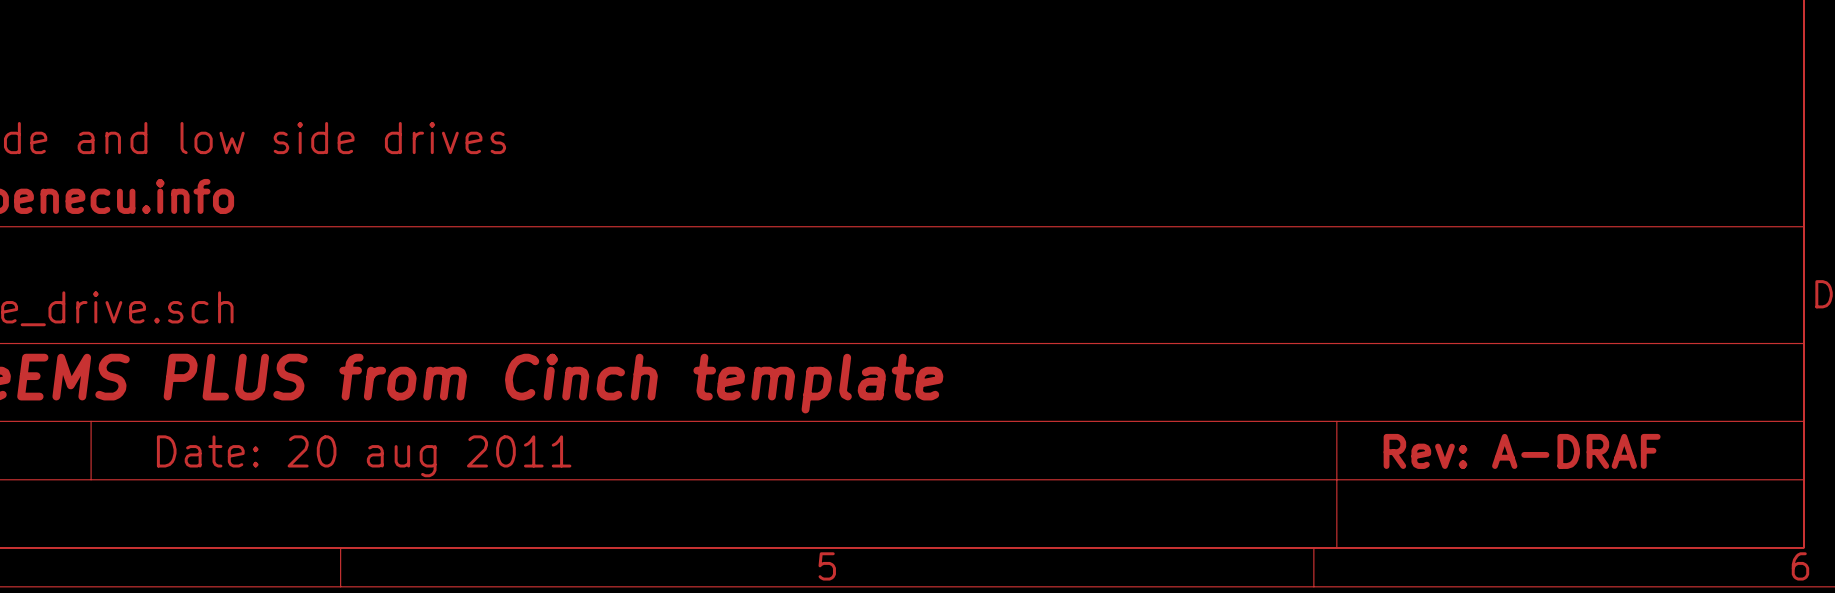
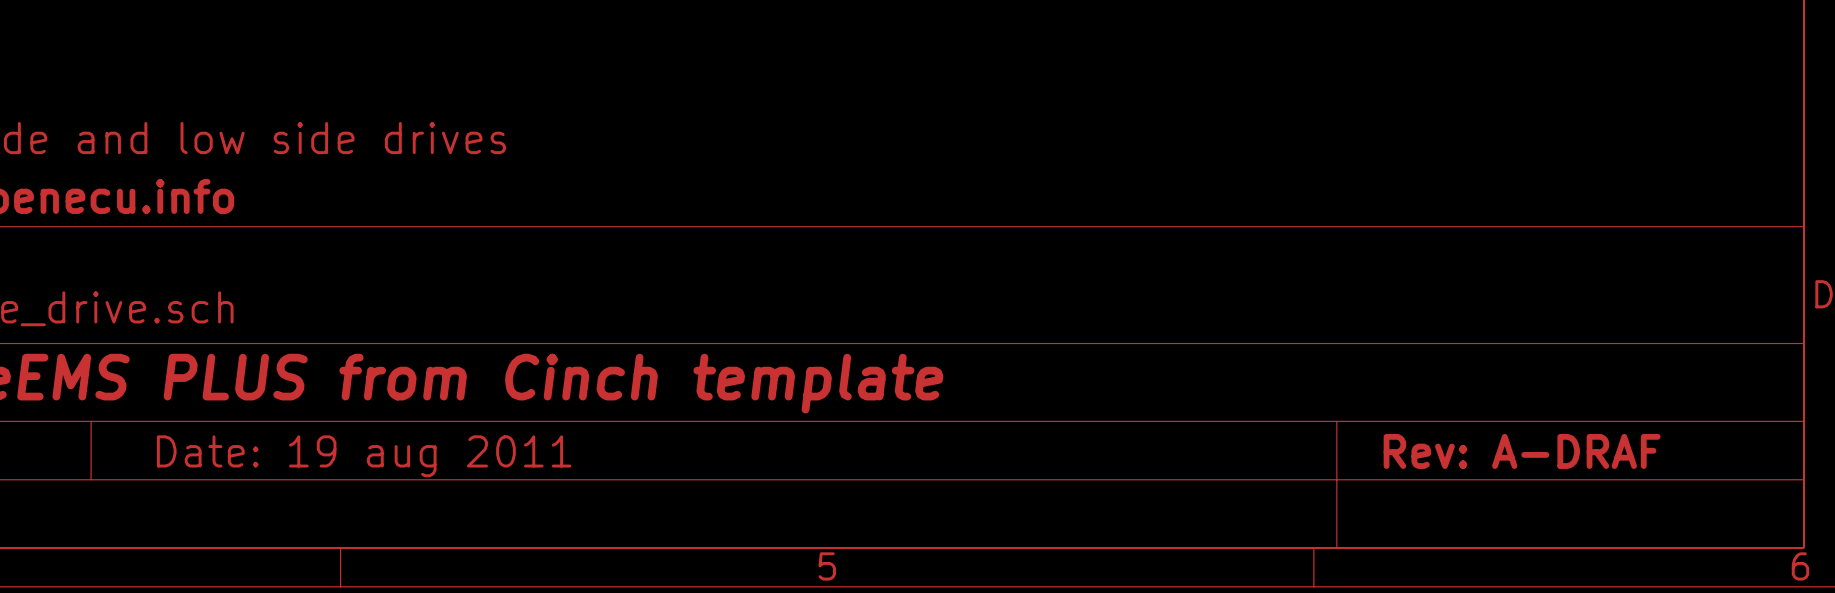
title block: Date: 20 aug 2011 (364, 456) -> Date: 19 aug 2011 (364, 456)

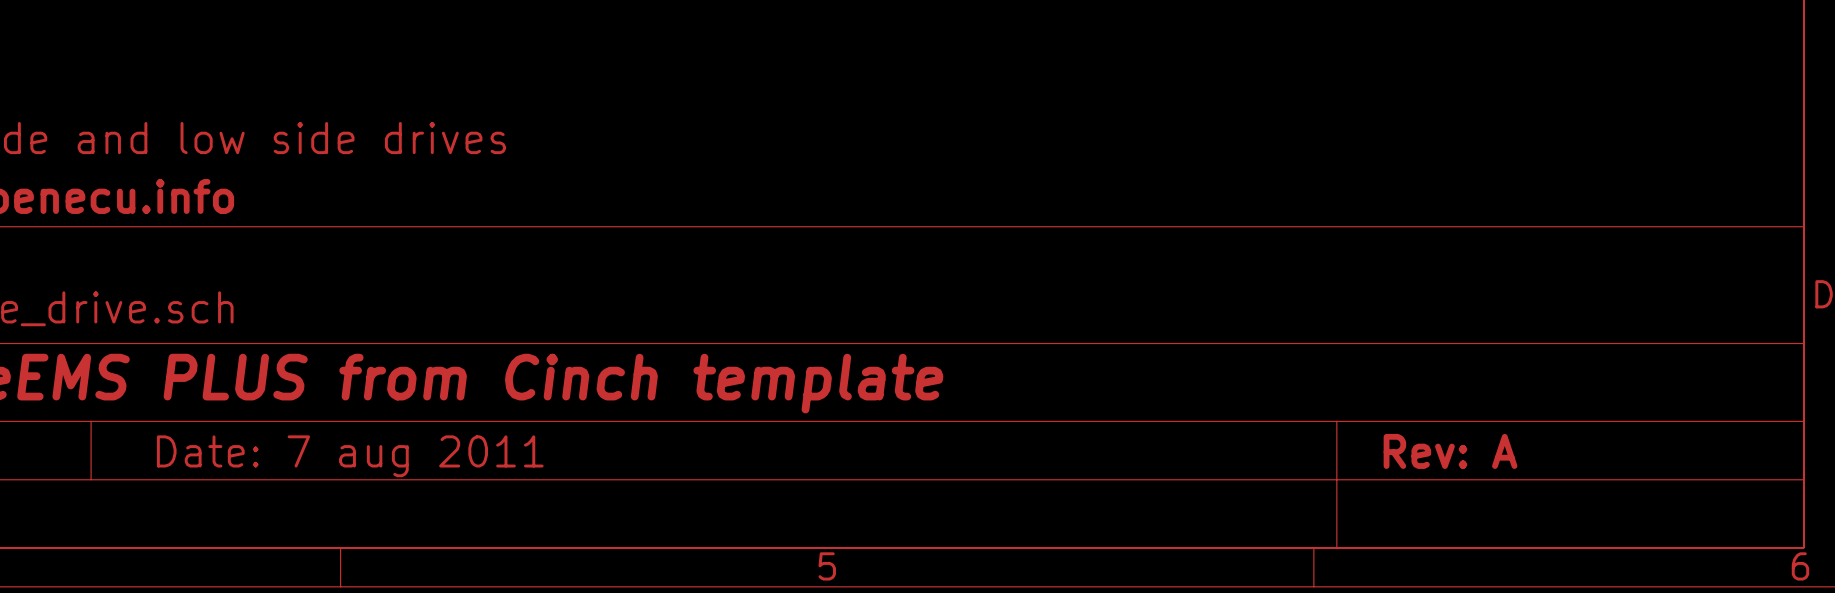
title block: Rev: A-DRAF (1522, 451) -> Rev: A (1450, 451)
title block: Date: 19 aug 2011 (364, 456) -> Date: 7 aug 2011 (350, 456)

